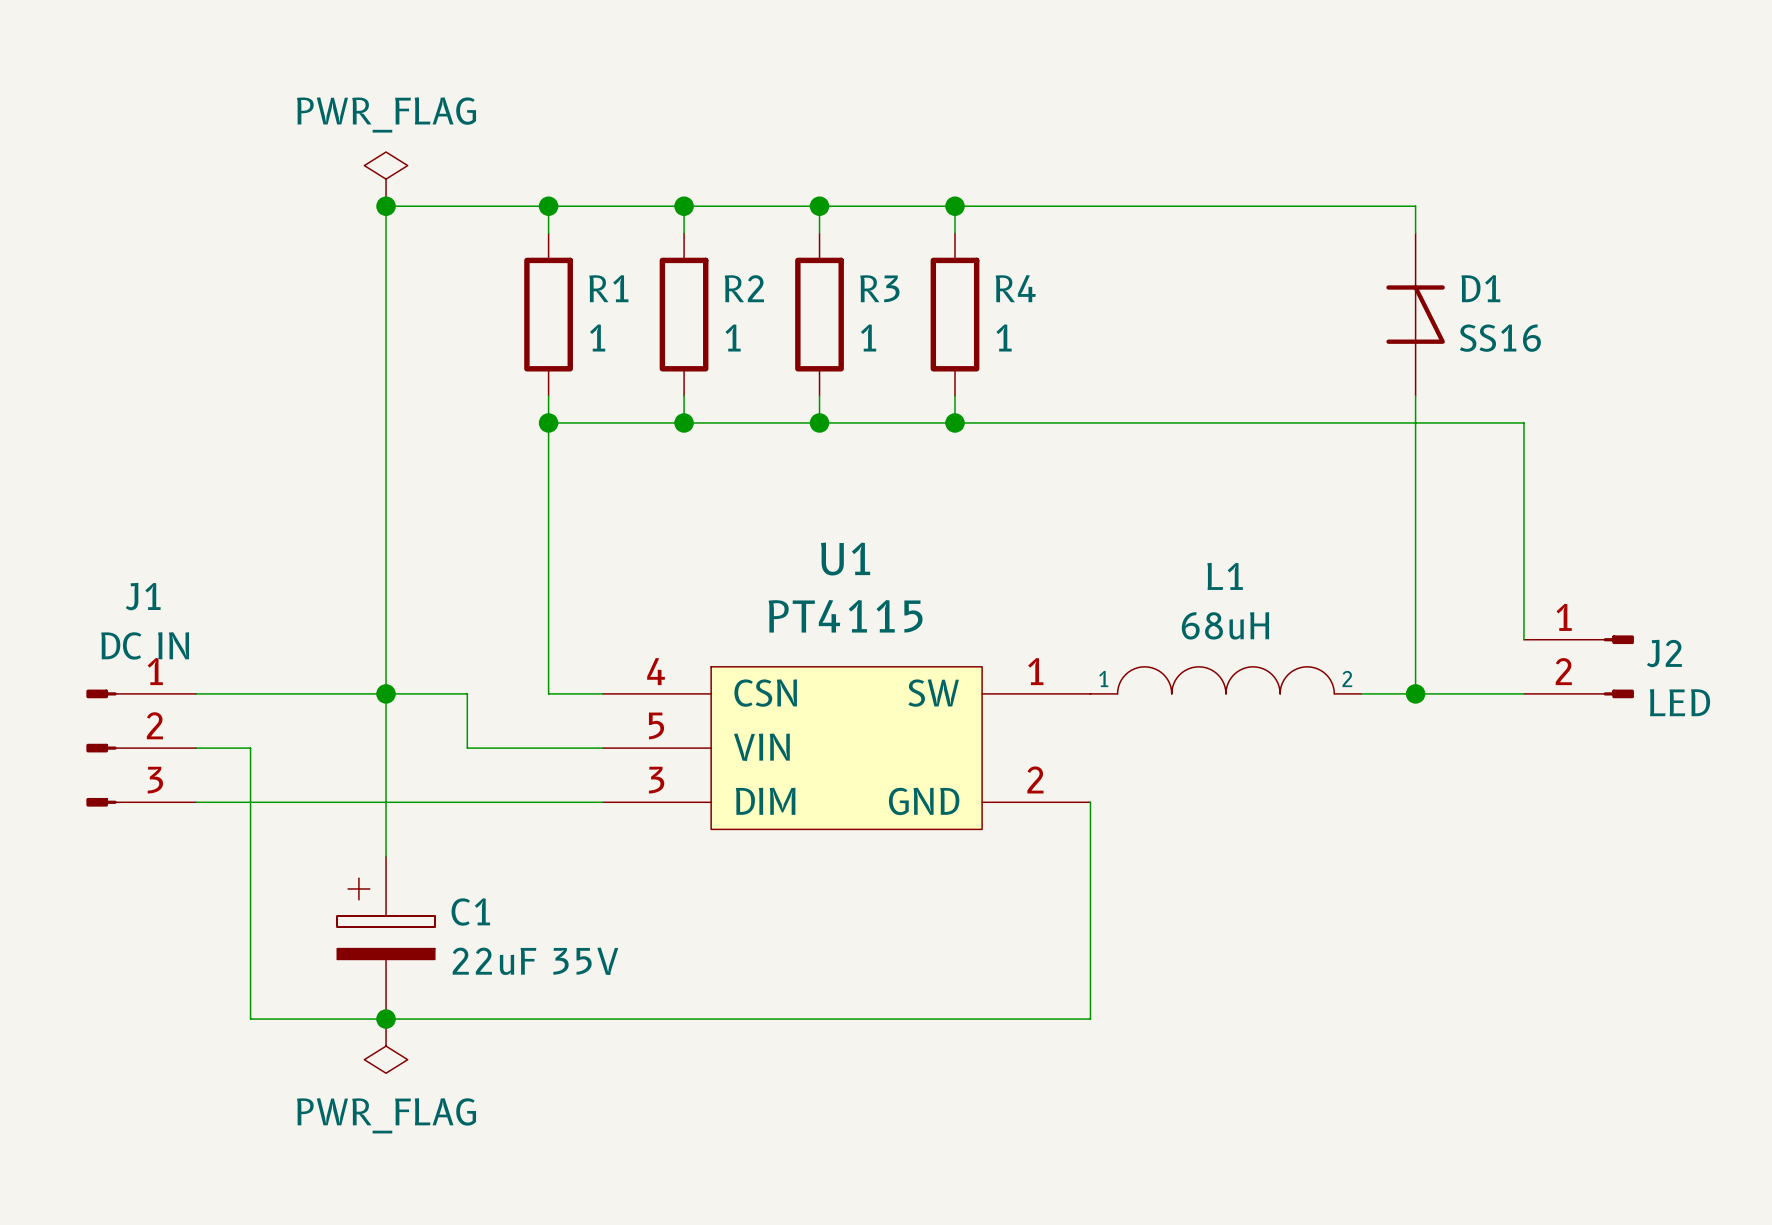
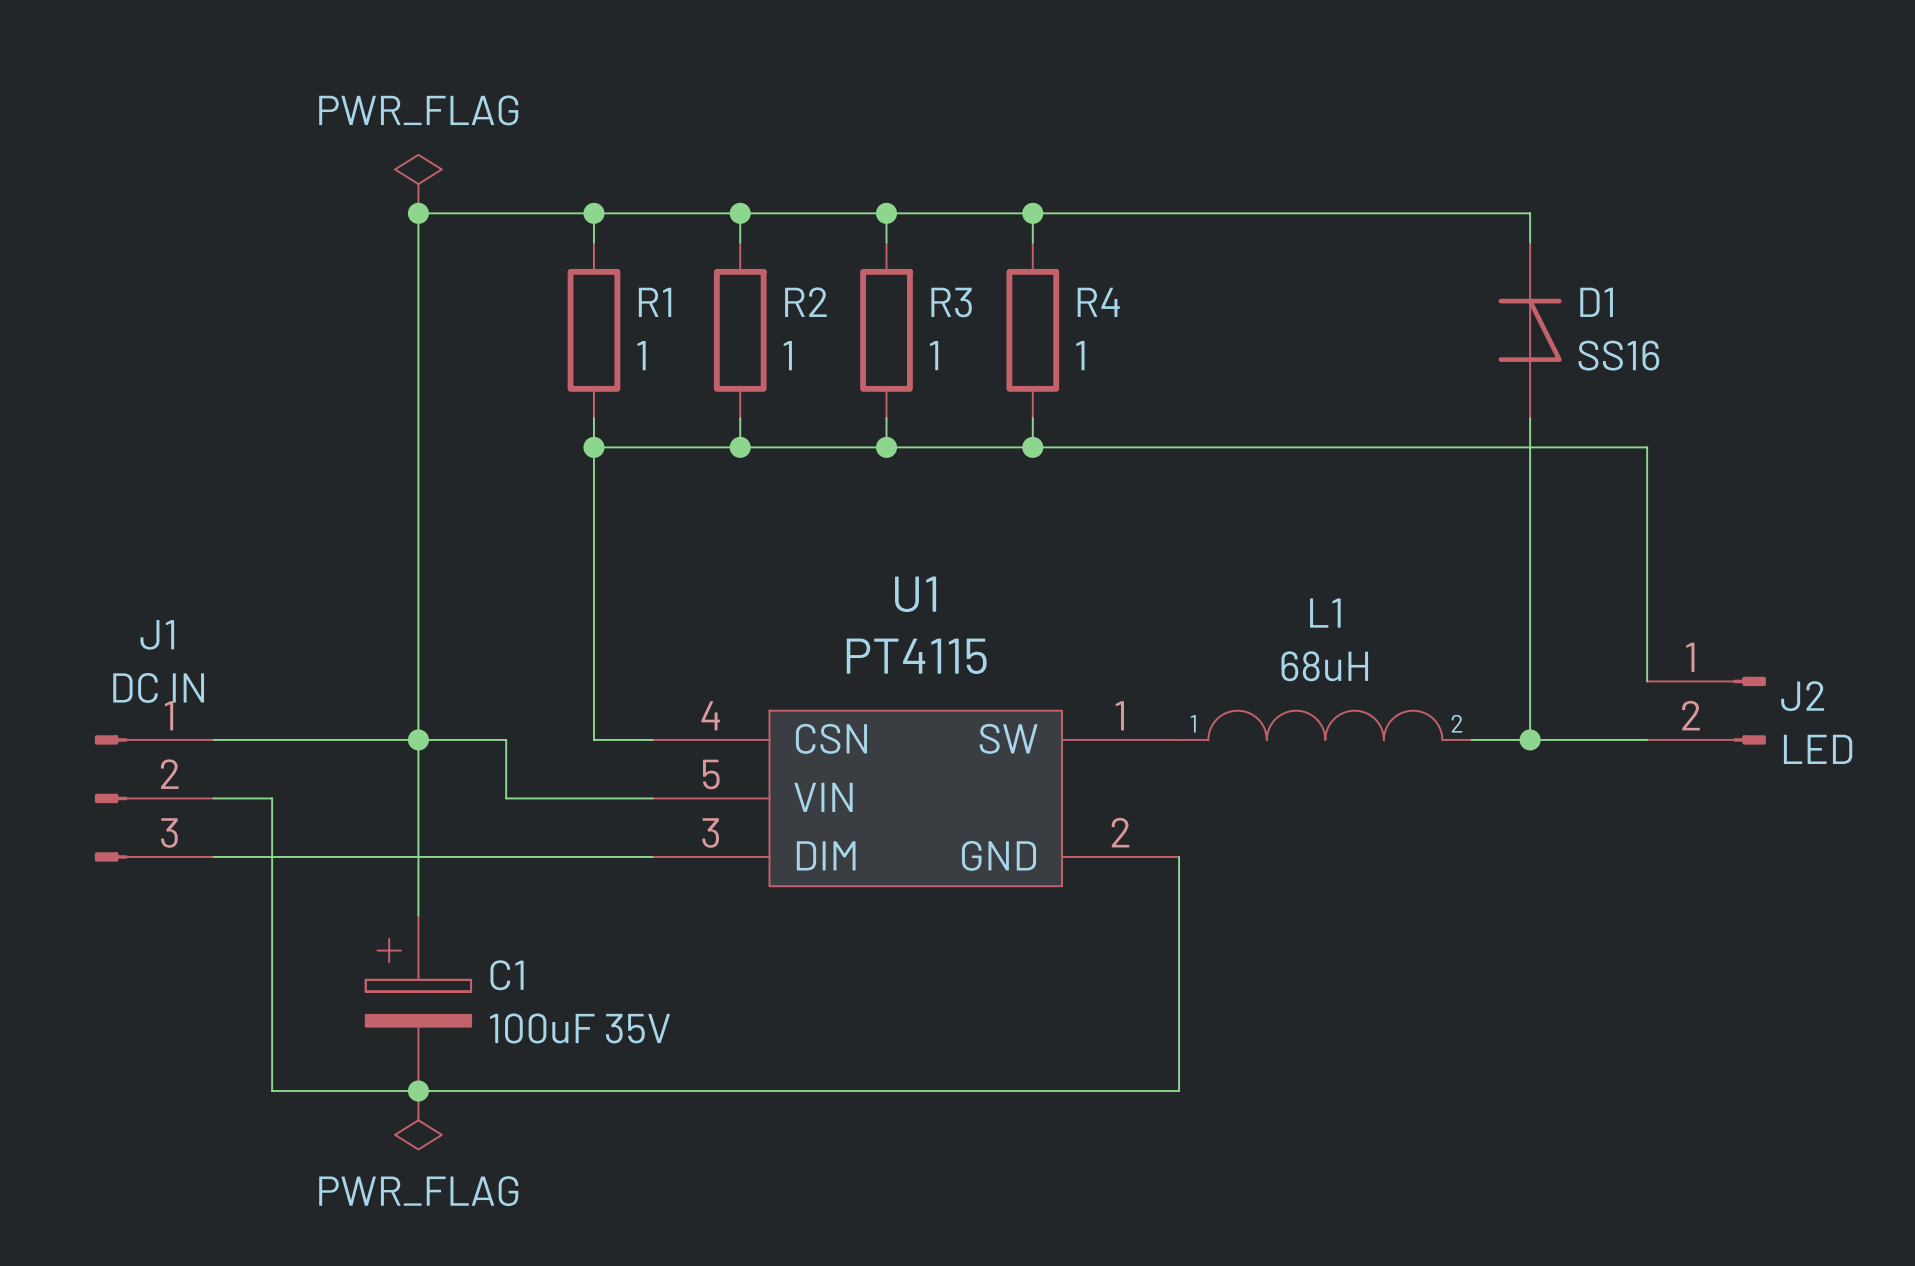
C1 value: 22uF 35V (535, 961) -> 100uF 35V (579, 1028)

